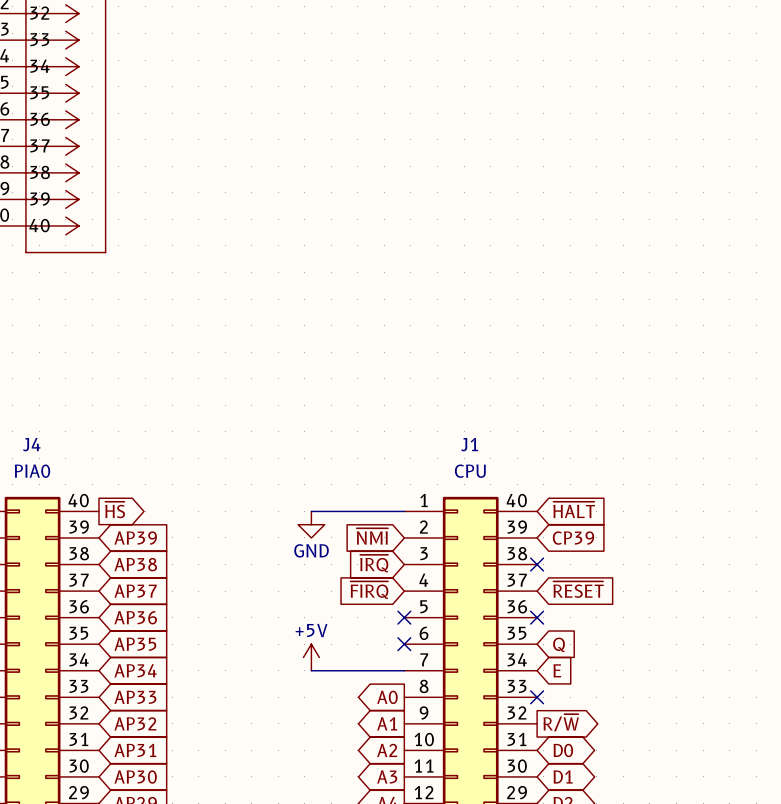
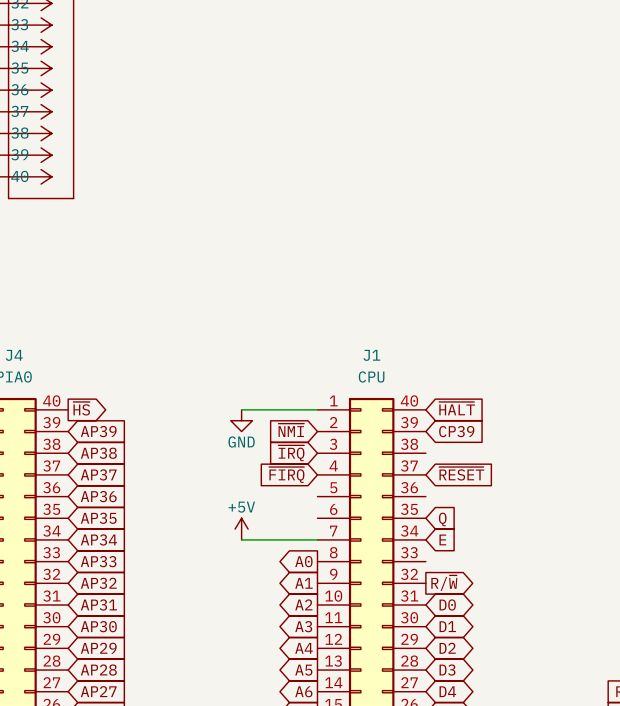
no-connect mark: (537, 564) -> none
no-connect mark: (404, 617) -> none
no-connect mark: (537, 617) -> none
no-connect mark: (404, 644) -> none
no-connect mark: (537, 697) -> none

